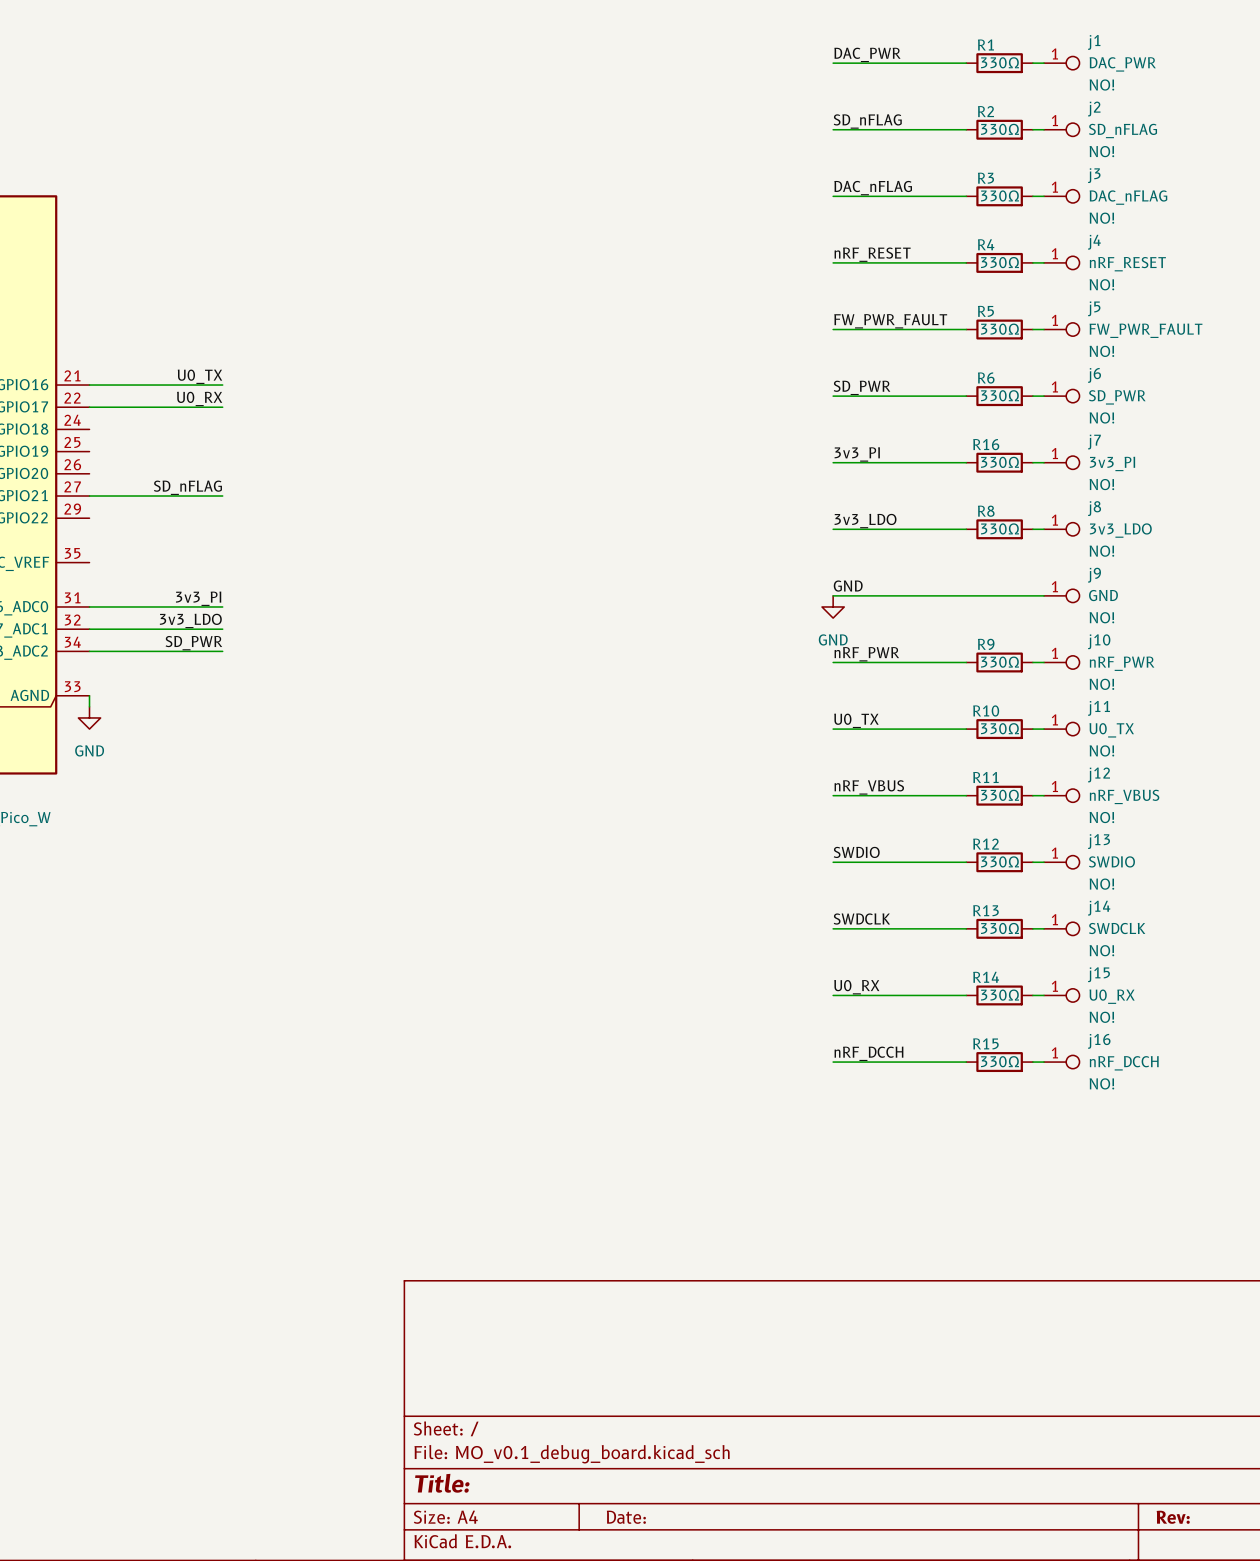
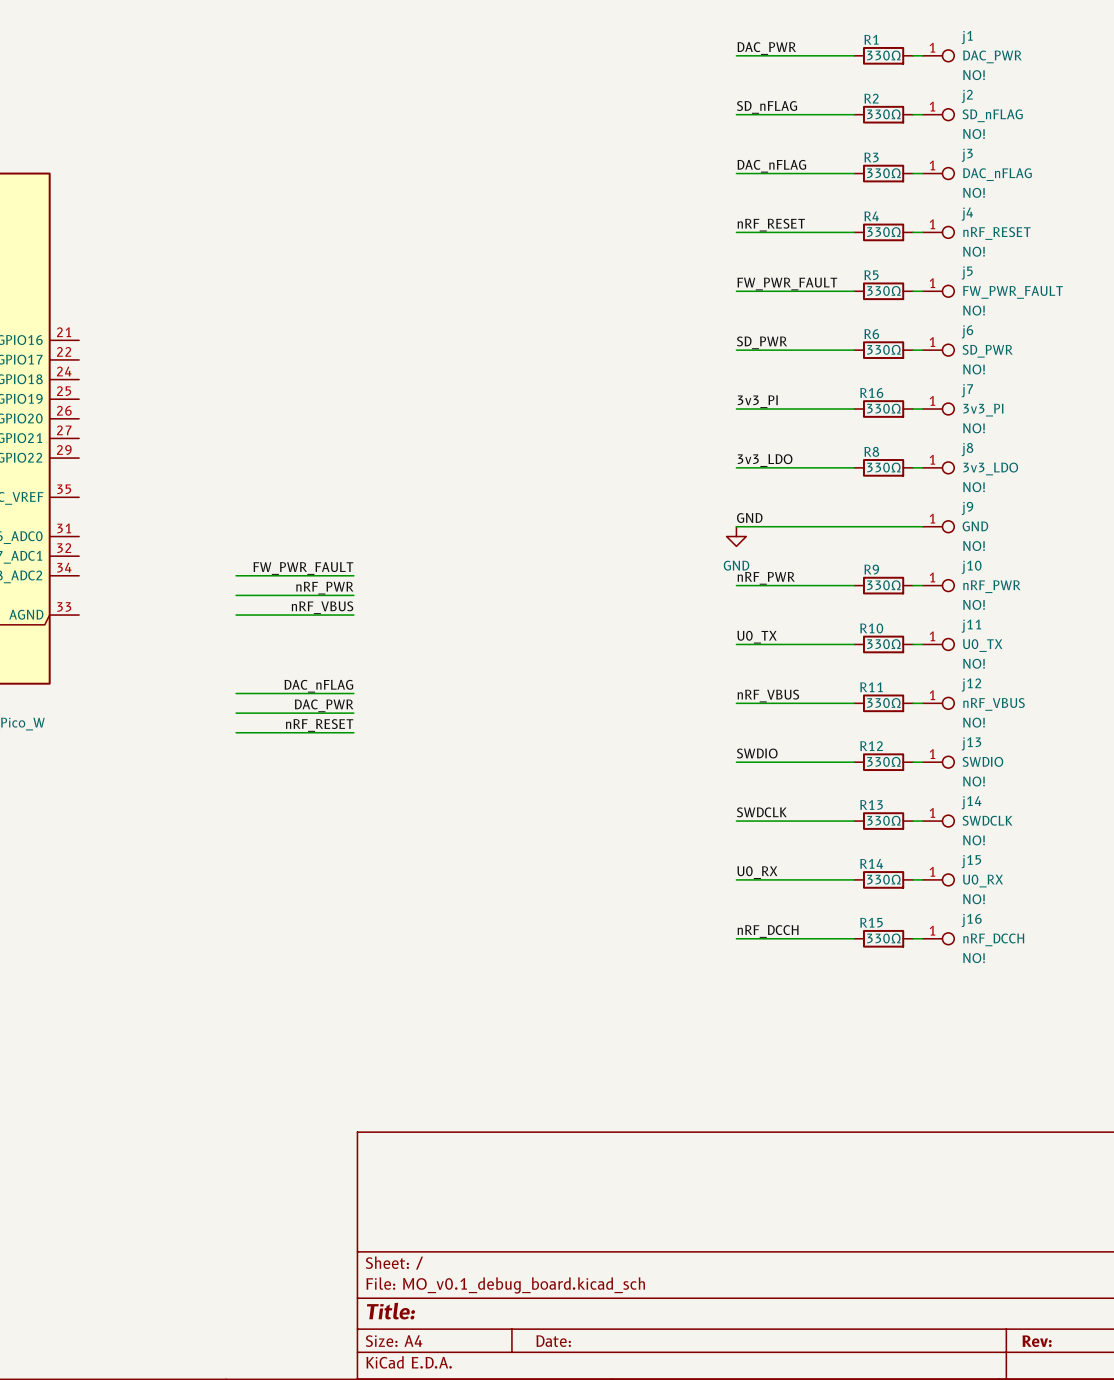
label: U0_TX (199, 376) -> none
wire: (89, 385) (222, 385) -> none
label: U0_RX (199, 398) -> none
wire: (89, 407) (222, 407) -> none
label: SD_nFLAG (187, 487) -> none
wire: (89, 496) (222, 496) -> none
label: 3v3_PI (198, 598) -> none
wire: (89, 606) (222, 606) -> (236, 575) (353, 575)
label: 3v3_LDO (190, 620) -> none
wire: (89, 629) (222, 629) -> (236, 595) (353, 595)
label: SD_PWR (193, 643) -> none
label: none -> FW_PWR_FAULT (303, 568)
wire: (89, 651) (222, 651) -> (236, 615) (353, 615)
label: none -> nRF_PWR (324, 588)
label: none -> nRF_VBUS (322, 607)
wire: (89, 695) (89, 706) -> none
power symbol: GND (89, 717) -> none
label: none -> DAC_nFLAG (318, 686)
wire: none -> (236, 693) (353, 693)
label: none -> DAC_PWR (324, 705)
wire: none -> (236, 713) (353, 713)
label: none -> nRF_RESET (319, 725)
wire: none -> (236, 732) (353, 732)

